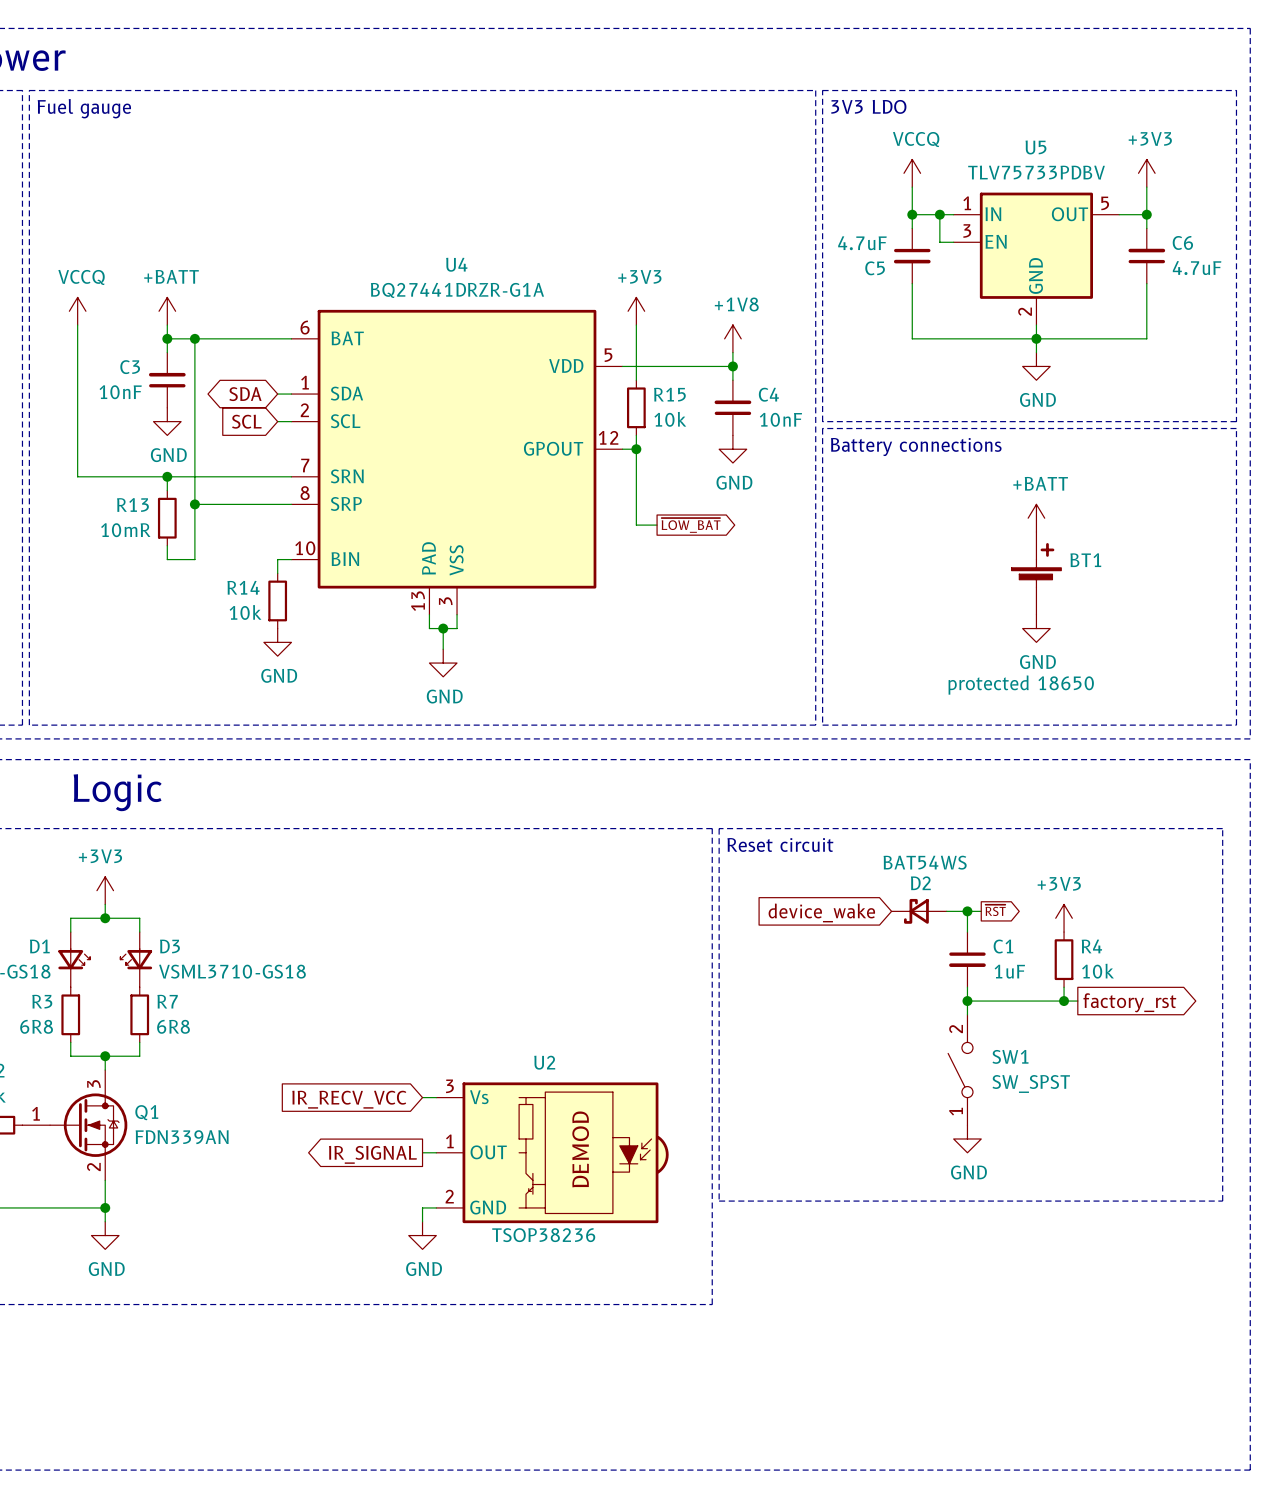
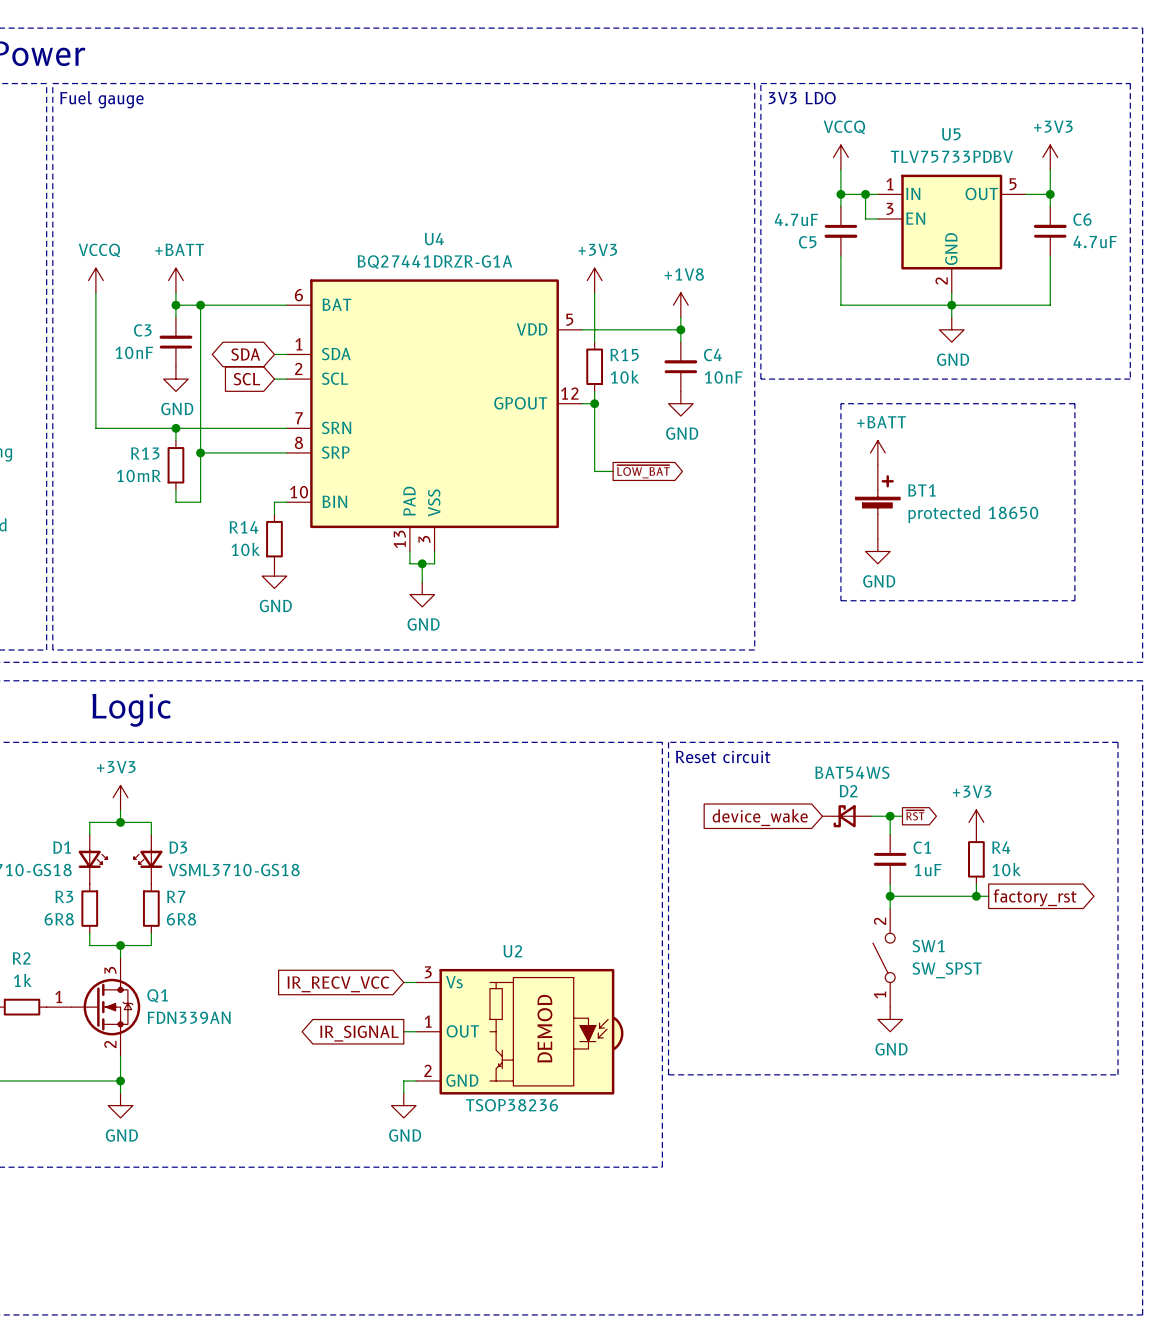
line: (822, 428) (822, 725) (1236, 725) (1236, 428) (822, 428) -> none
text: Battery connections (916, 447) -> none
line: none -> (840, 403) (840, 600) (1074, 600) (1074, 403) (840, 403)
power symbol position: +BATT (1036, 518) -> +BATT (877, 452)
BT1 position: (1036, 573) -> (877, 502)
power symbol position: GND (1036, 628) -> GND (877, 551)
BT1 value position: protected 18650 (1021, 685) -> protected 18650 (973, 514)

